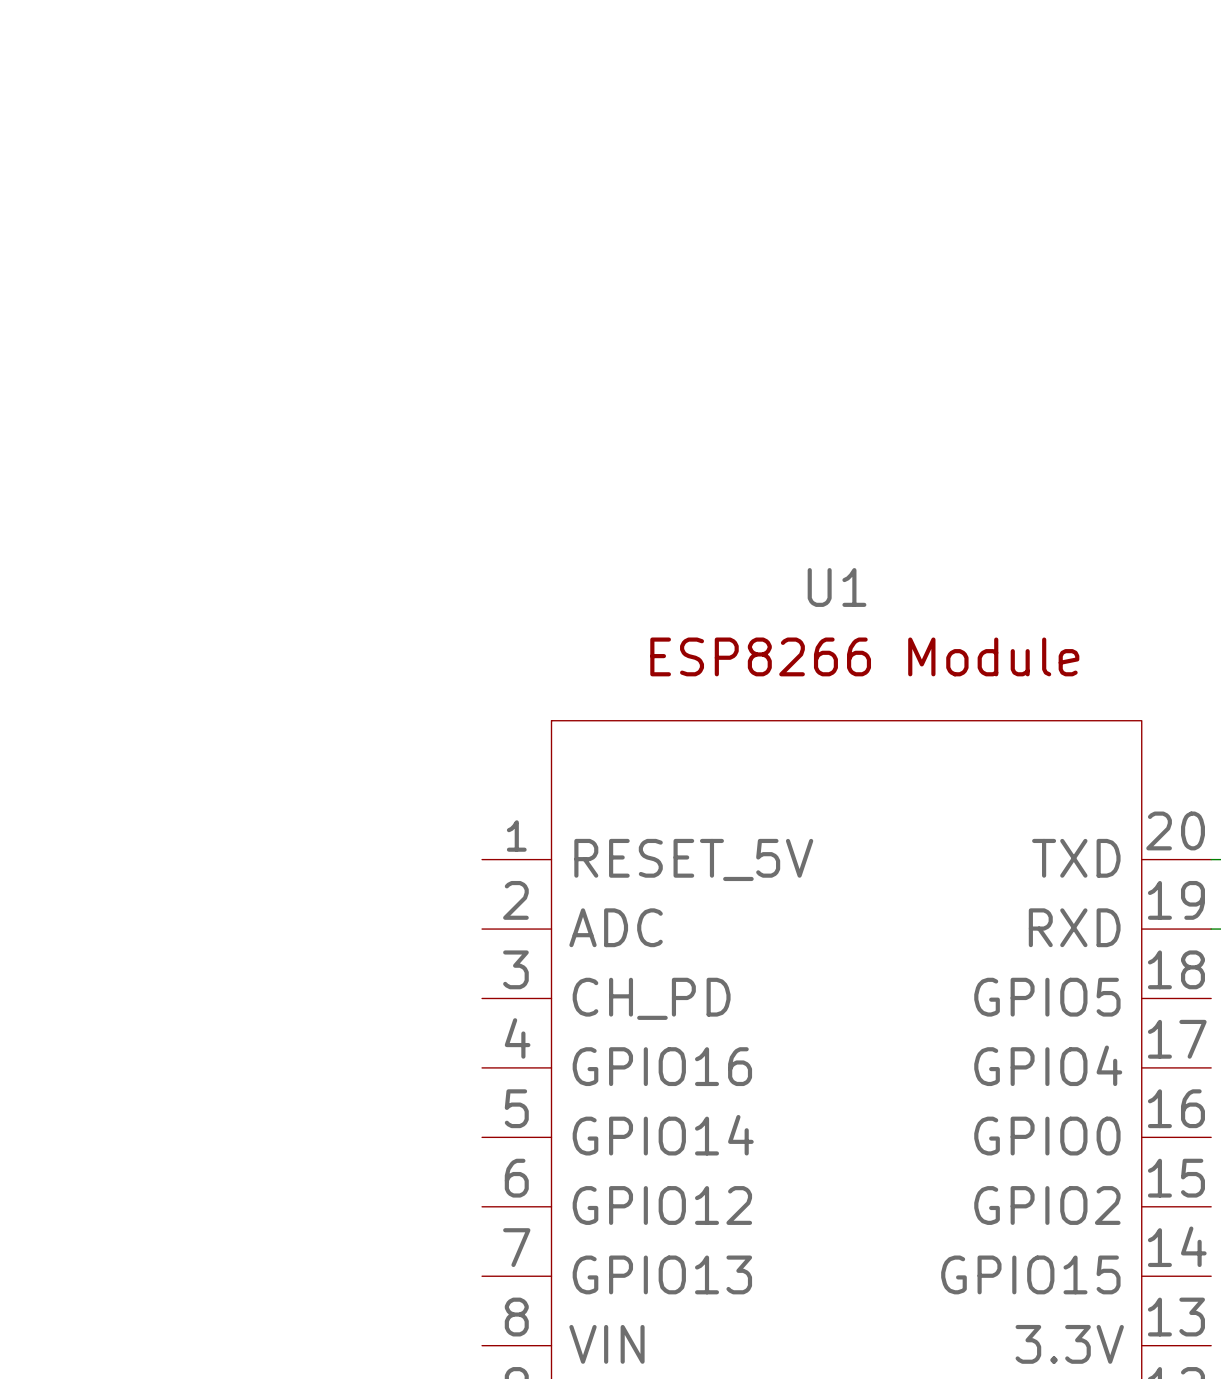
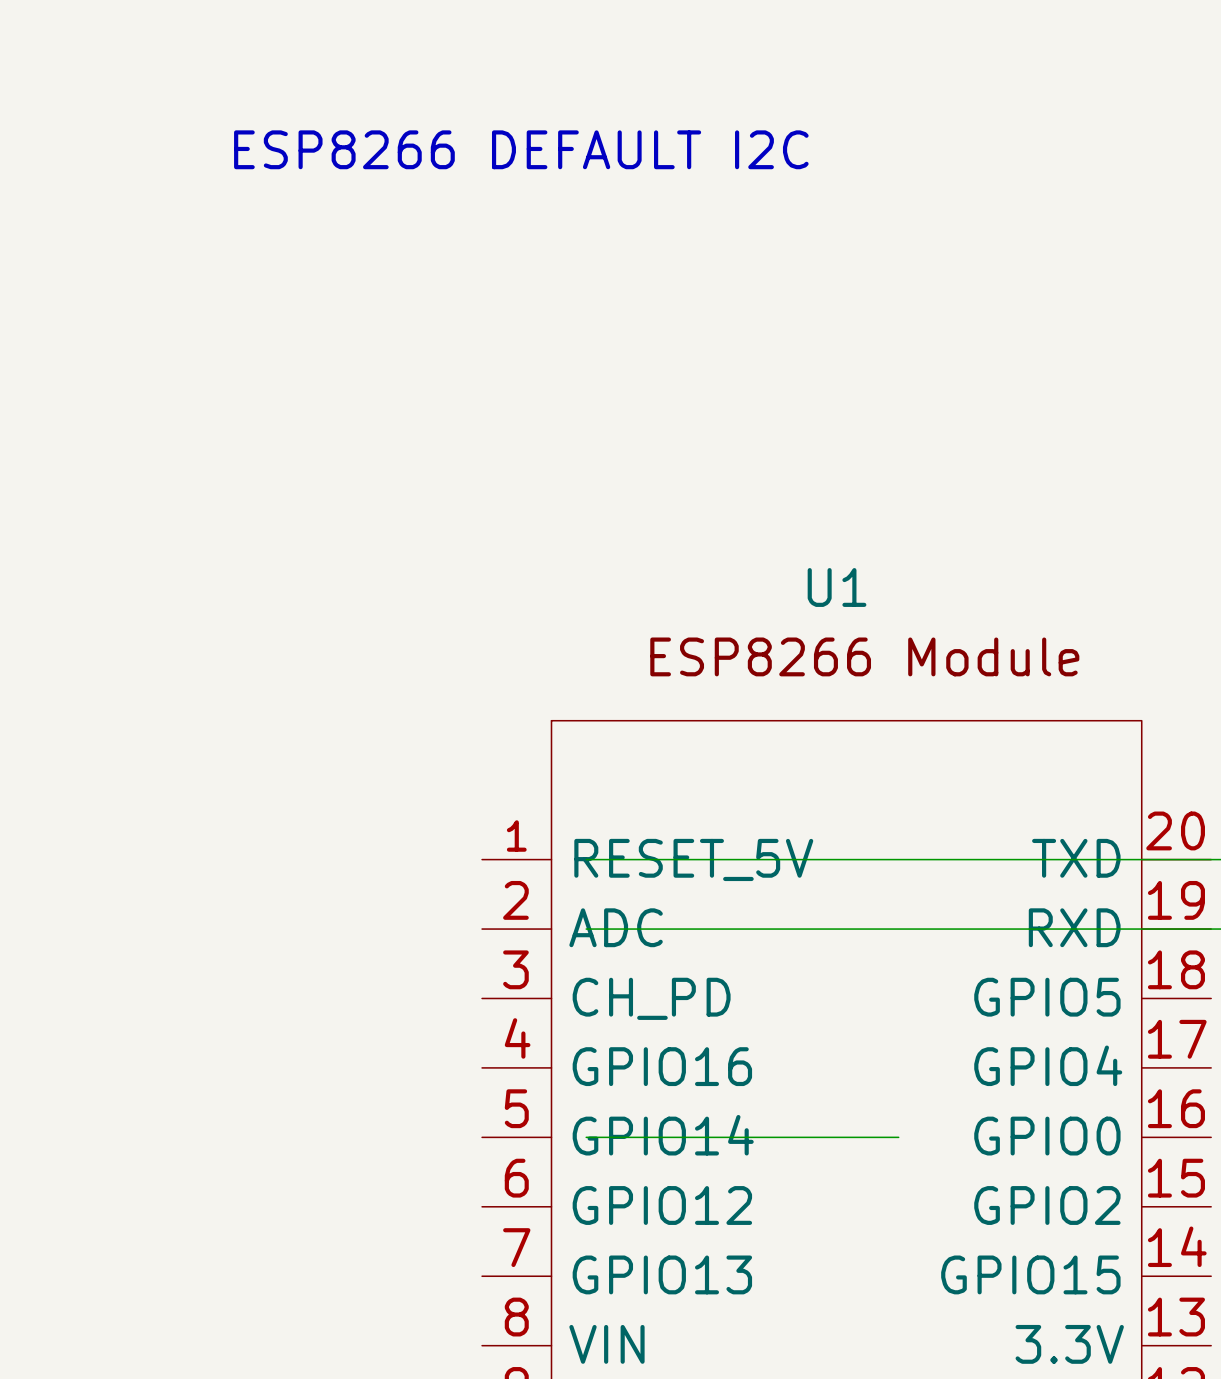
text: none -> ESP8266 DEFAULT I2C (521, 149)
wire: none -> (586, 859) (1211, 859)
wire: none -> (586, 929) (1211, 929)
wire: none -> (586, 1137) (898, 1137)

